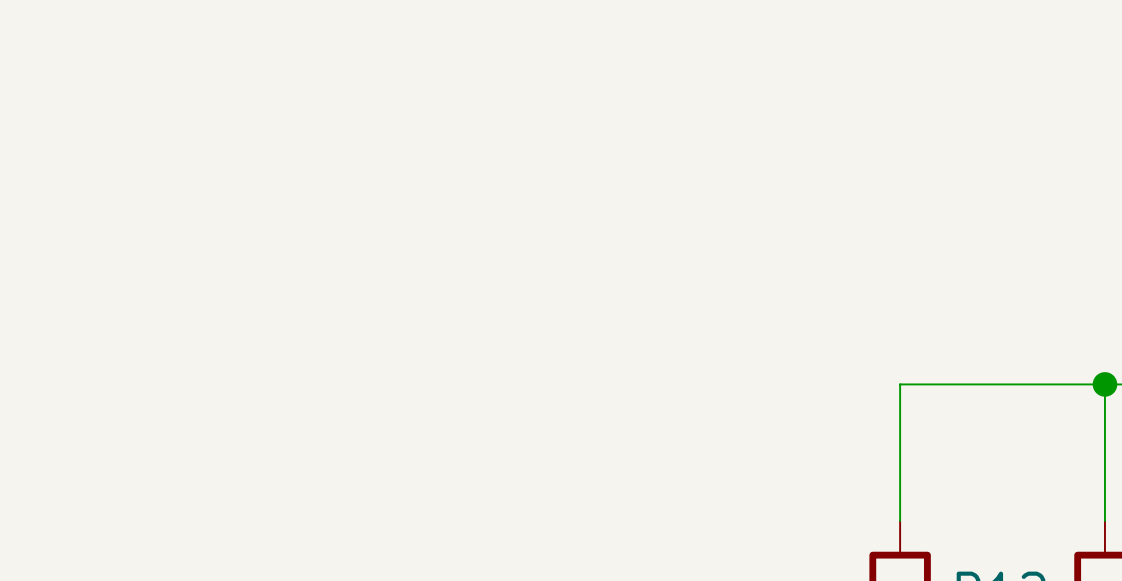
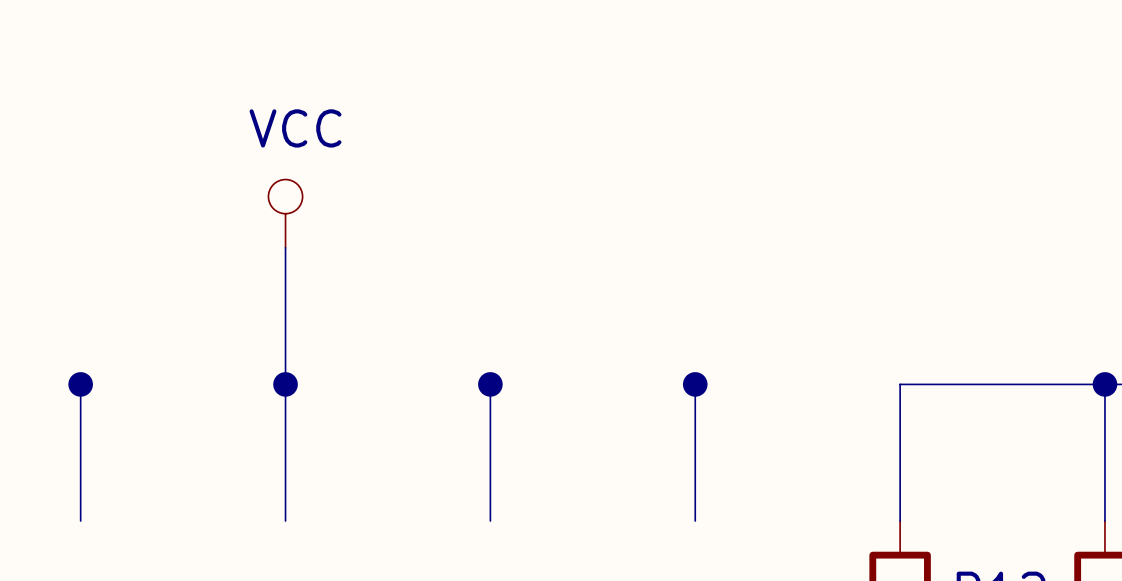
power symbol: none -> VCC (285, 213)
wire: none -> (285, 247) (285, 520)
wire: none -> (80, 384) (80, 520)
junction: none -> (80, 384)
junction: none -> (285, 384)
wire: none -> (490, 384) (490, 520)
junction: none -> (490, 384)
wire: none -> (695, 384) (695, 520)
junction: none -> (695, 384)

